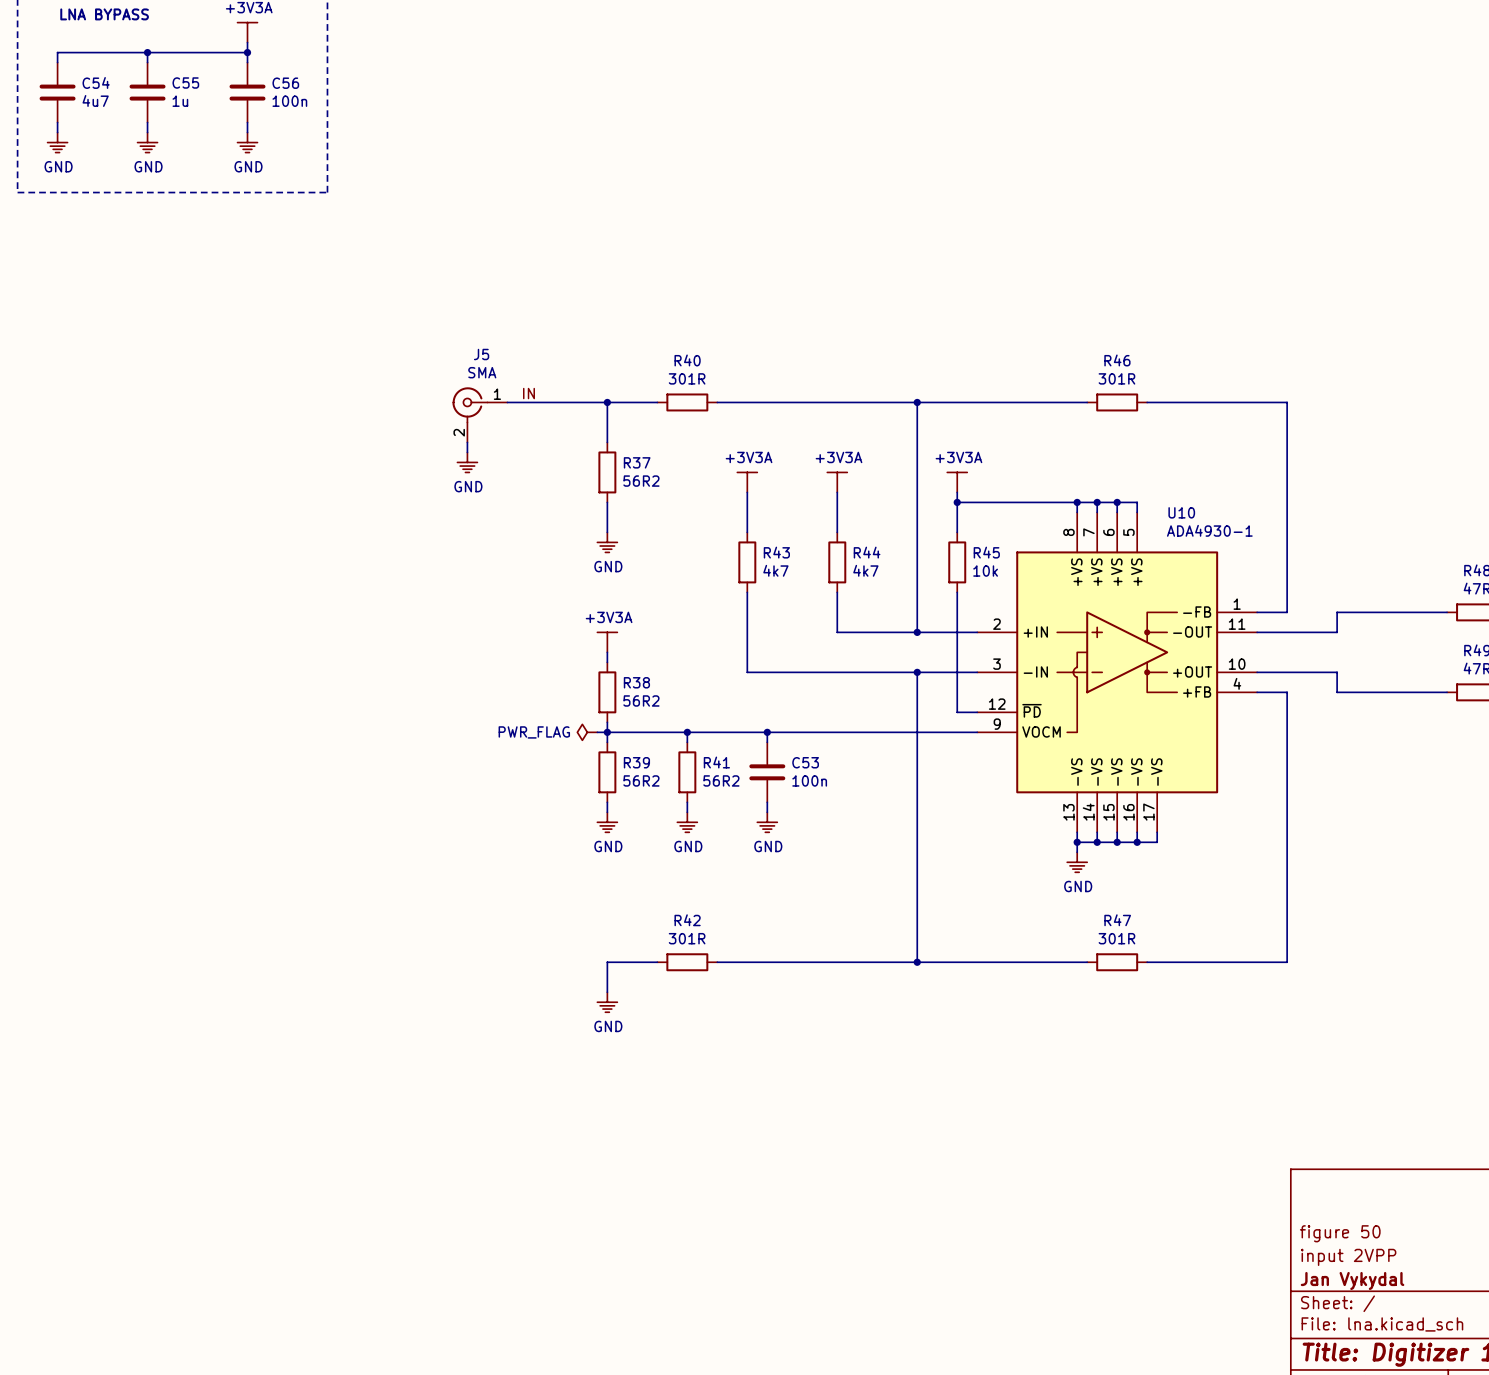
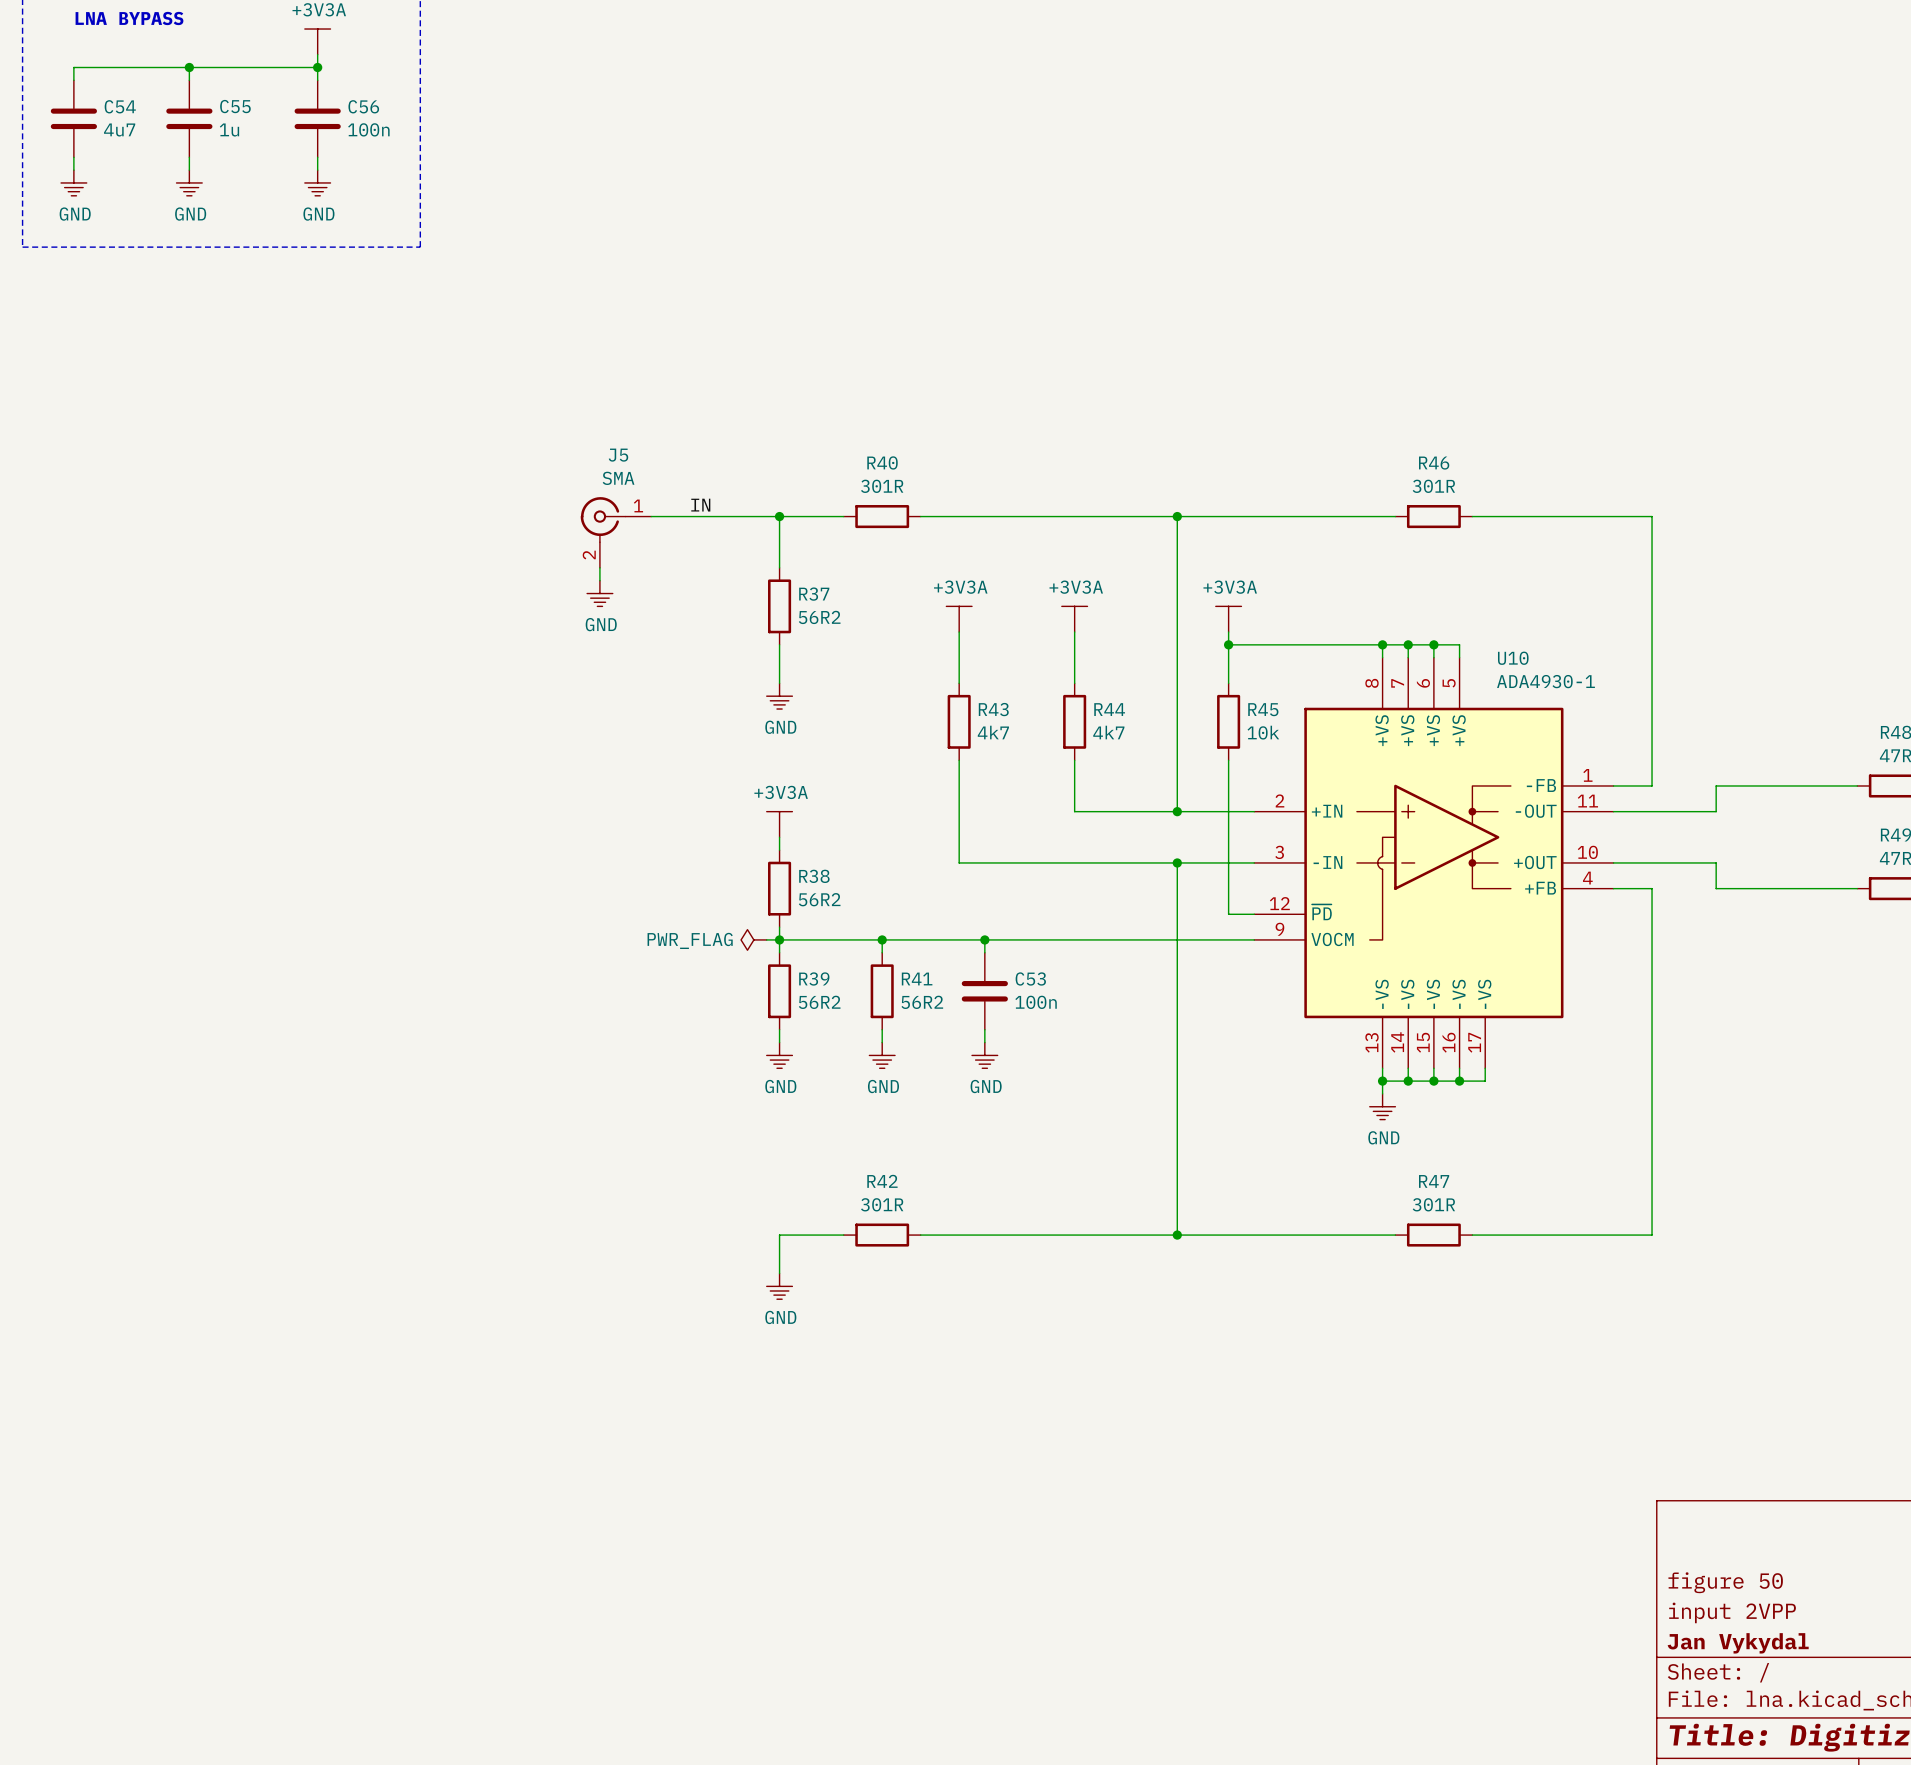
label position: IN (528, 393) -> IN (700, 505)

